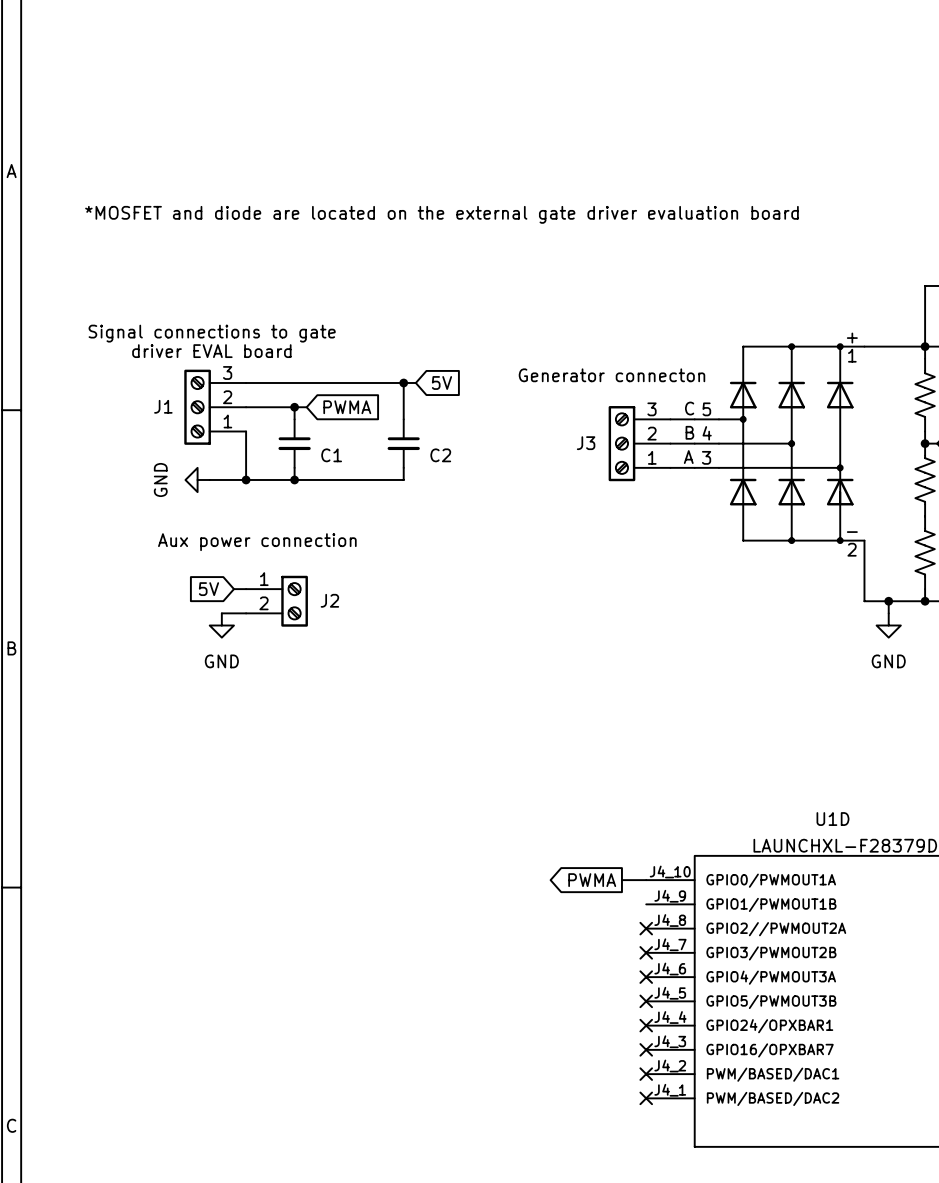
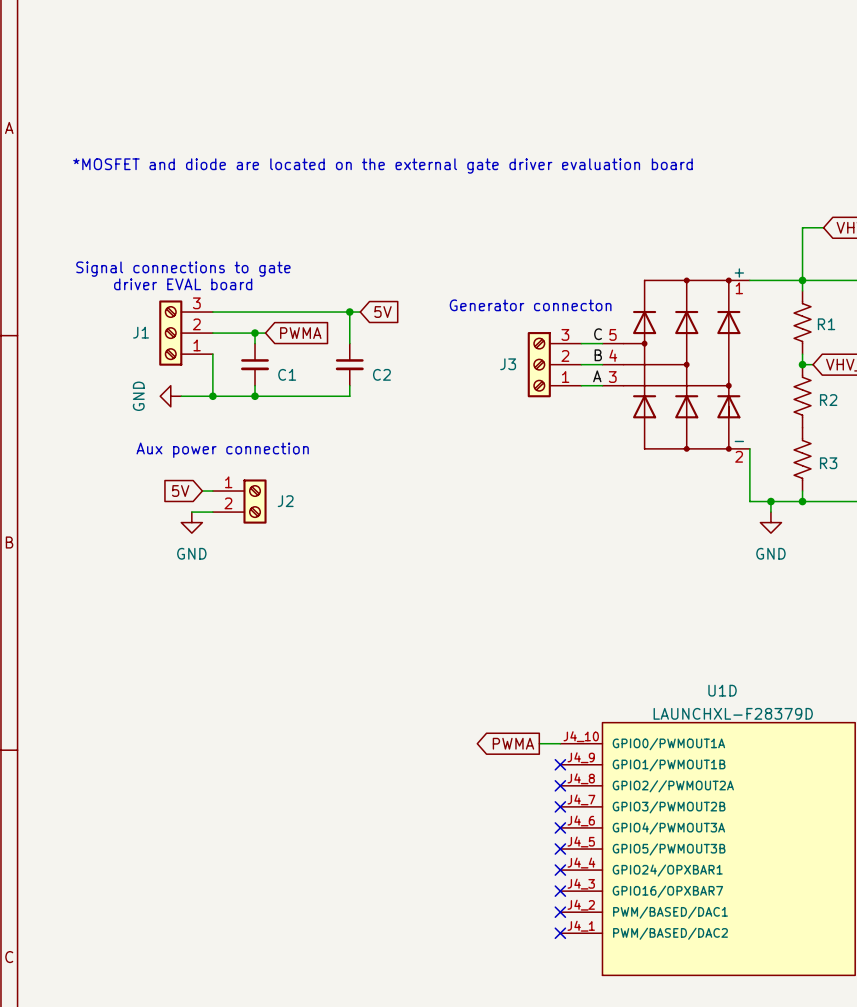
no-connect mark: none -> (560, 764)

